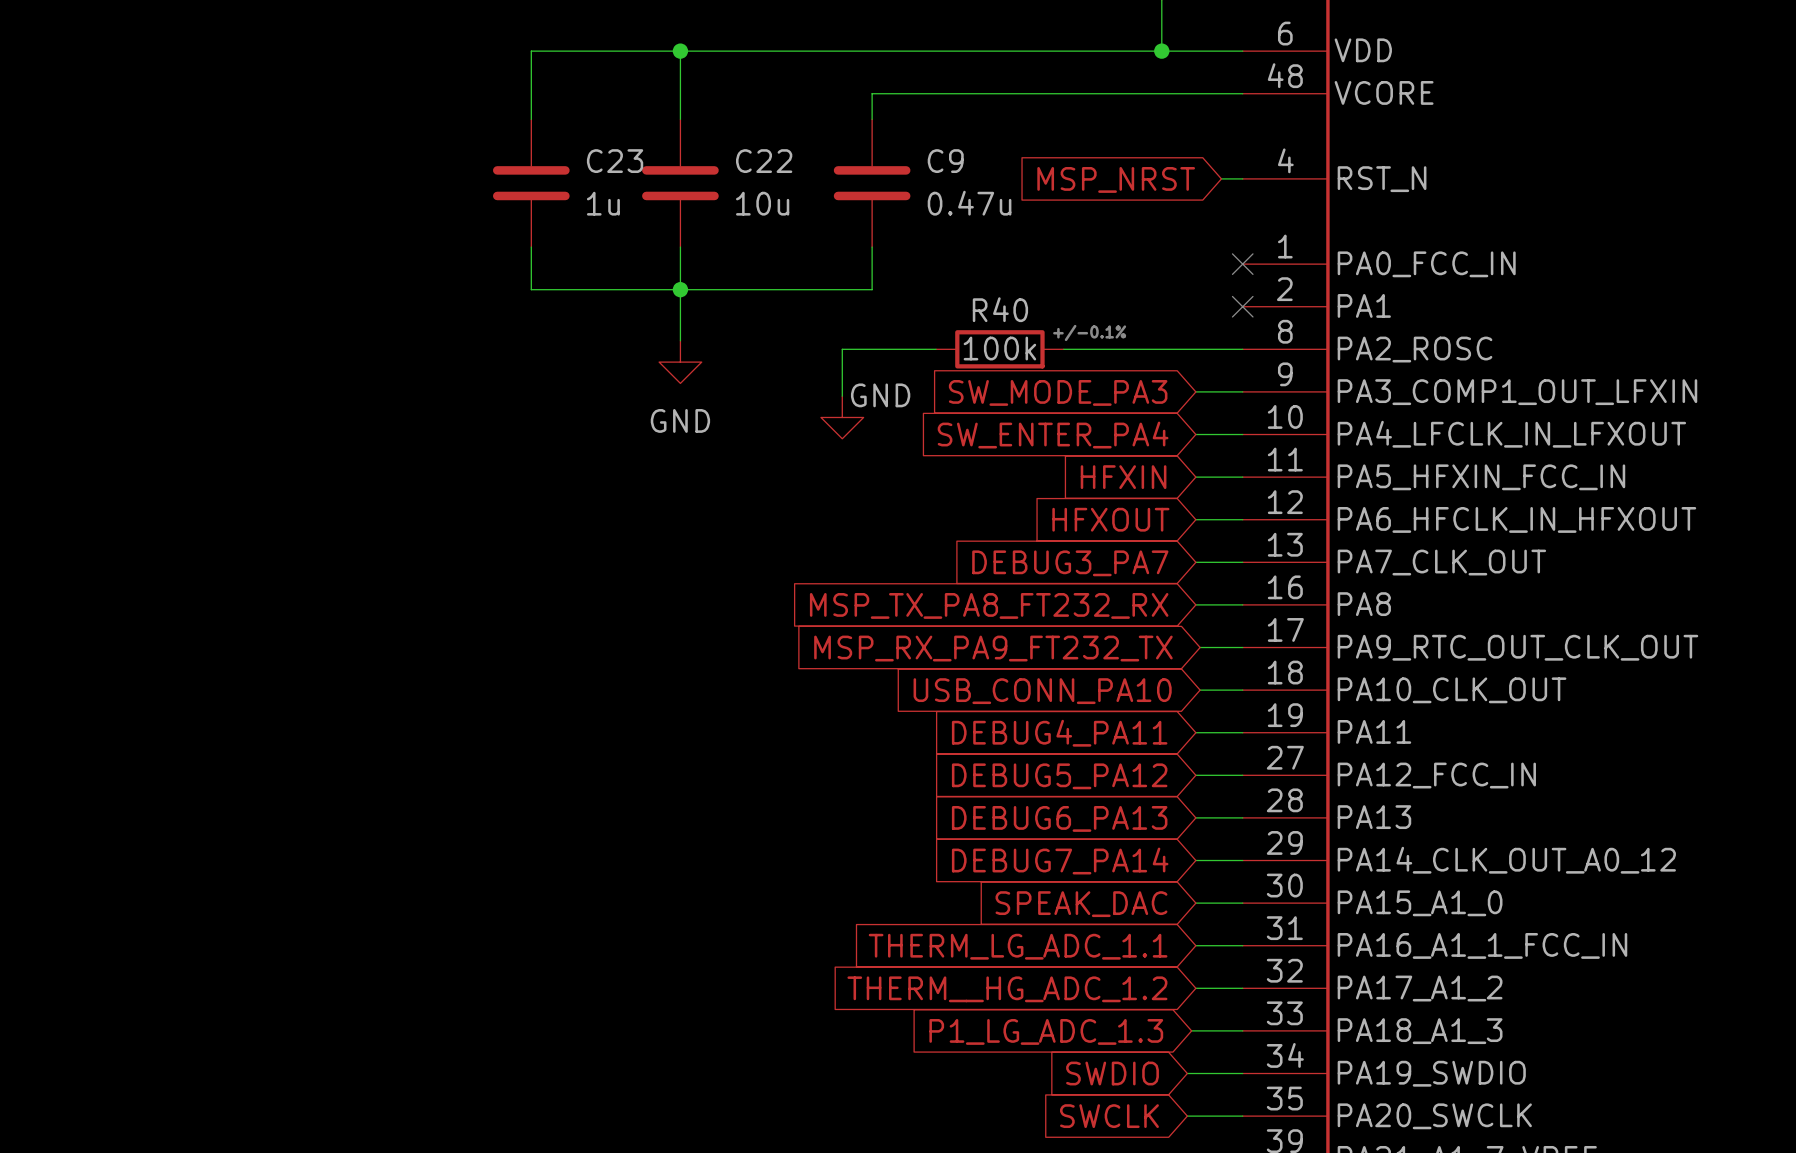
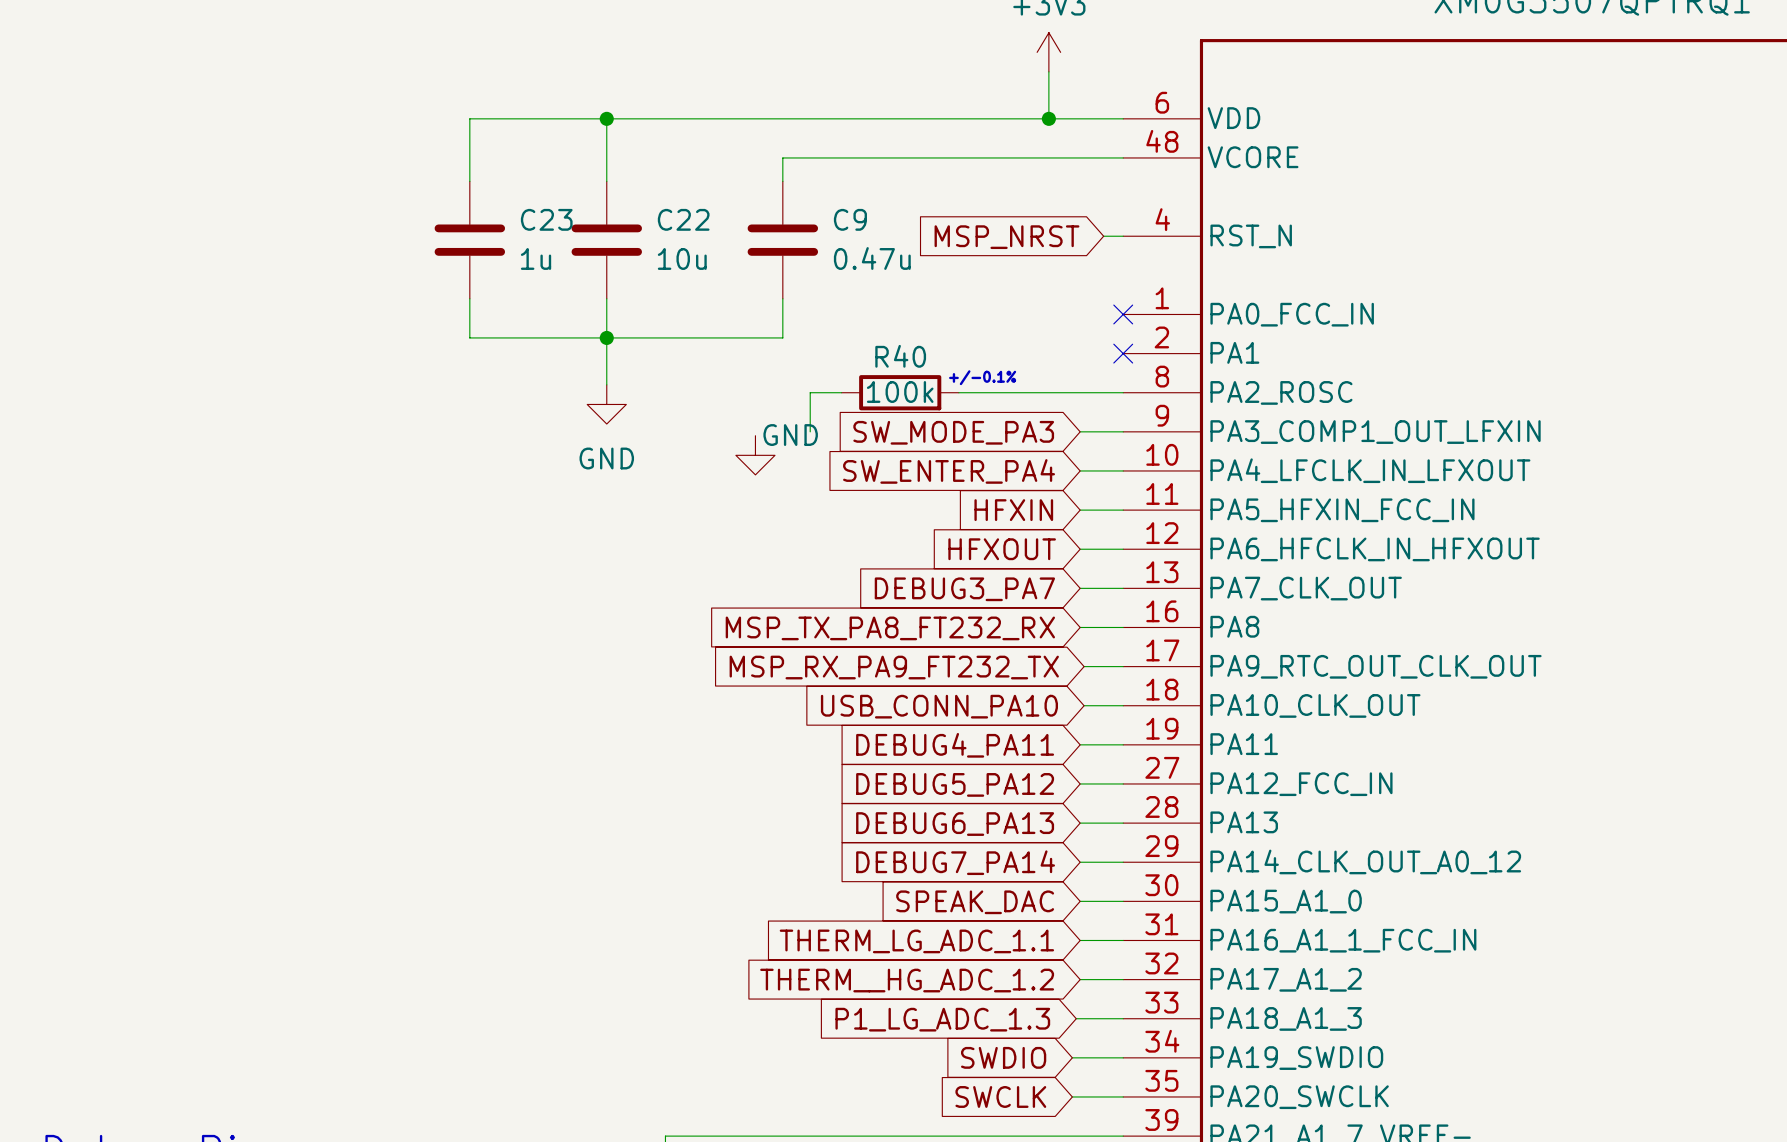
wire: (901, 349) (842, 349) (842, 396) -> (810, 392) (810, 431)

